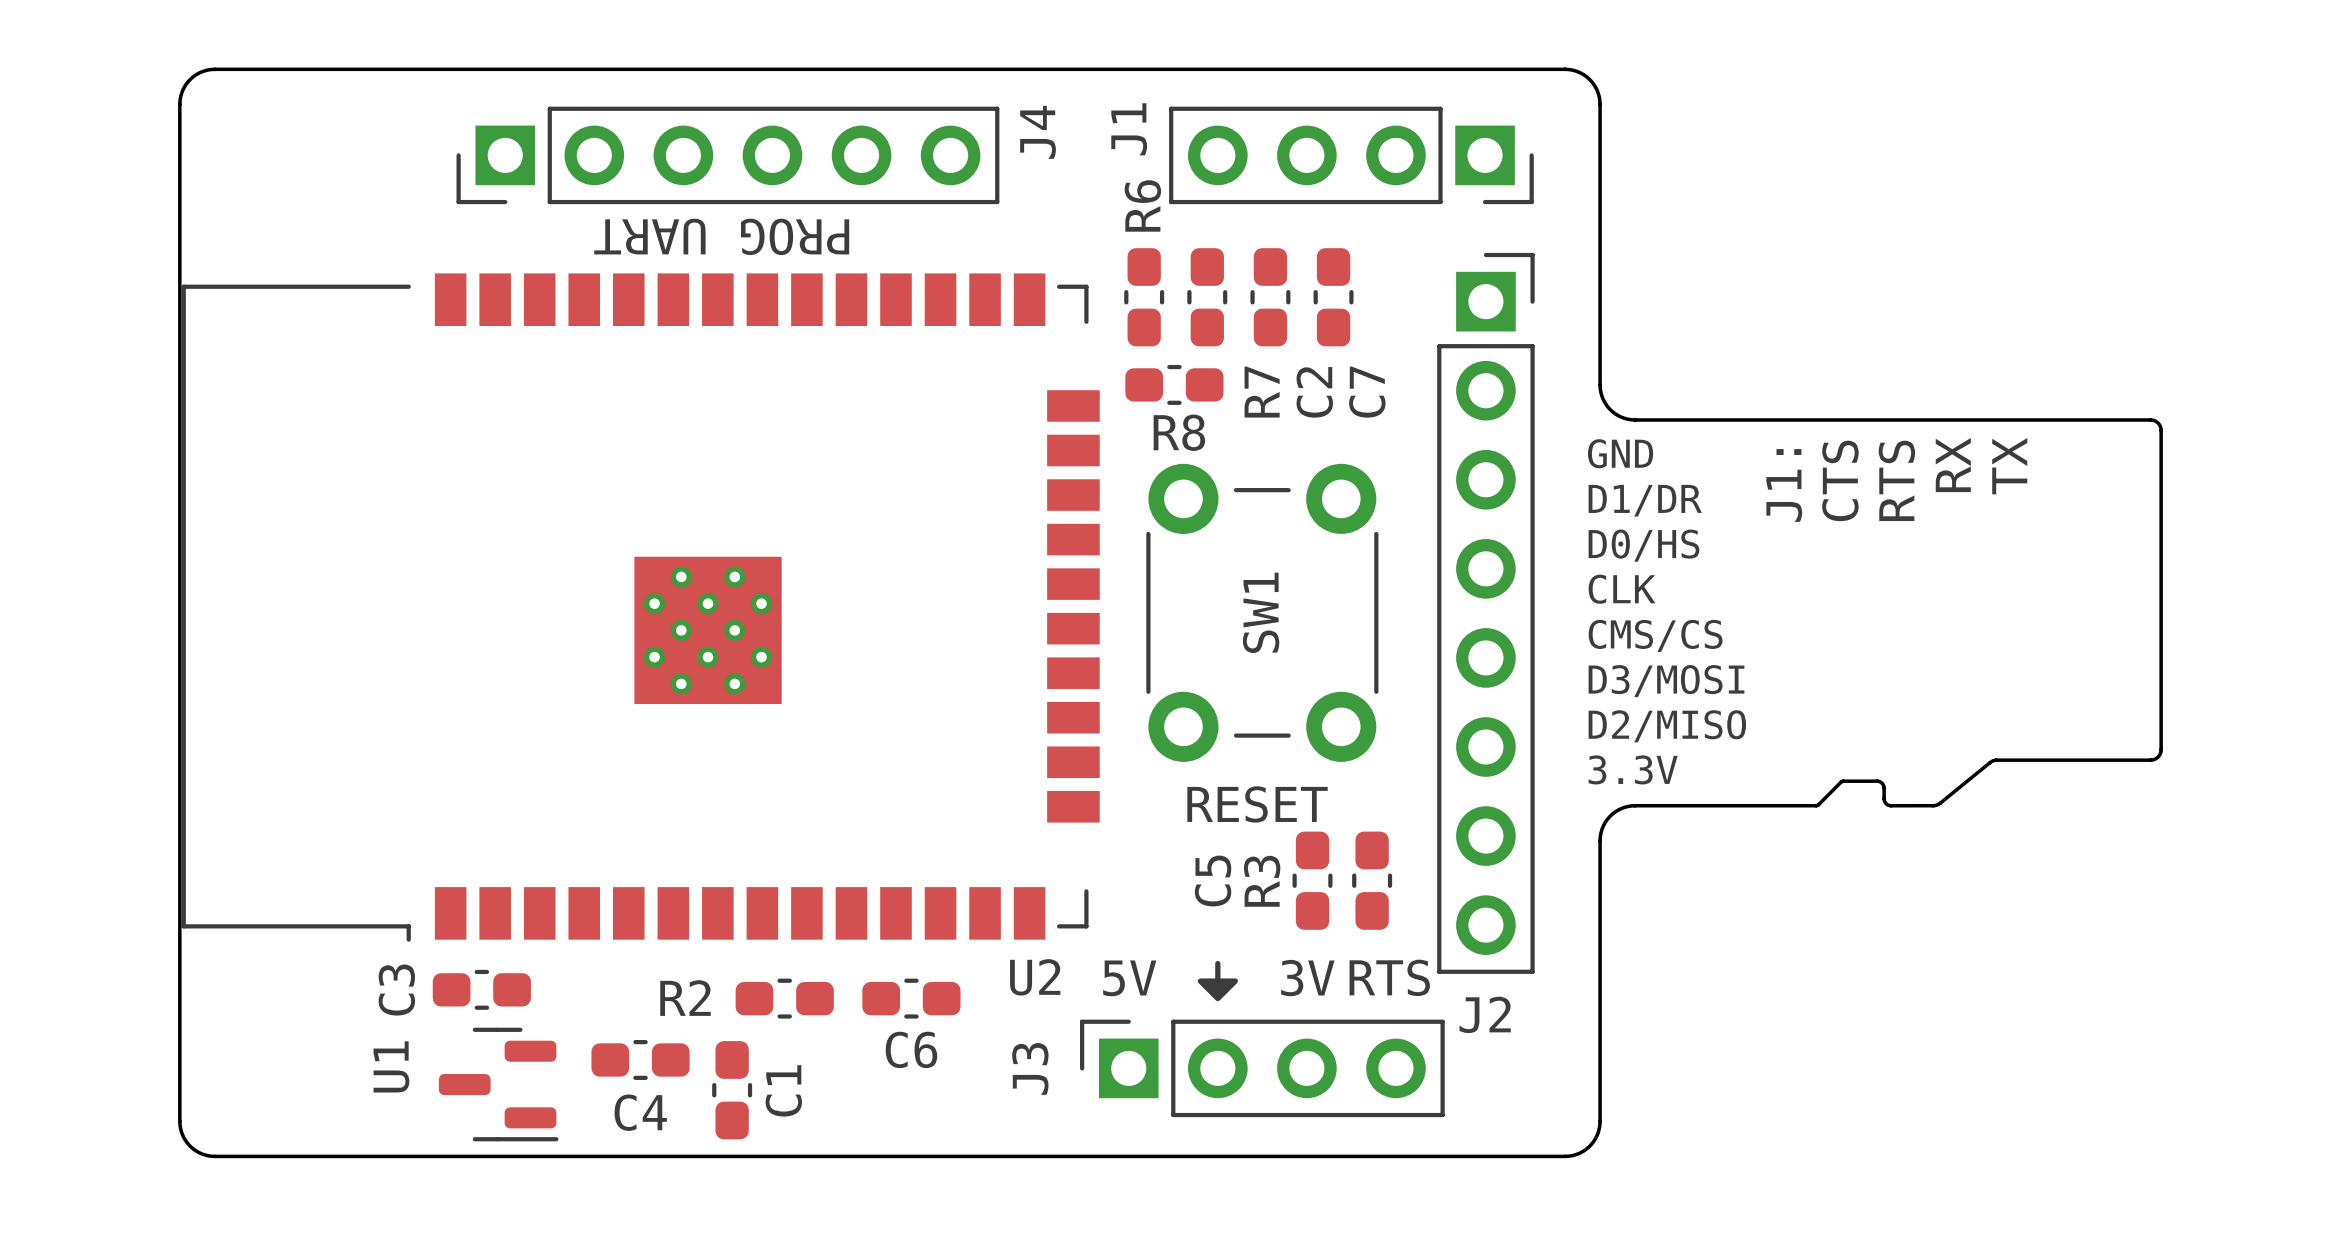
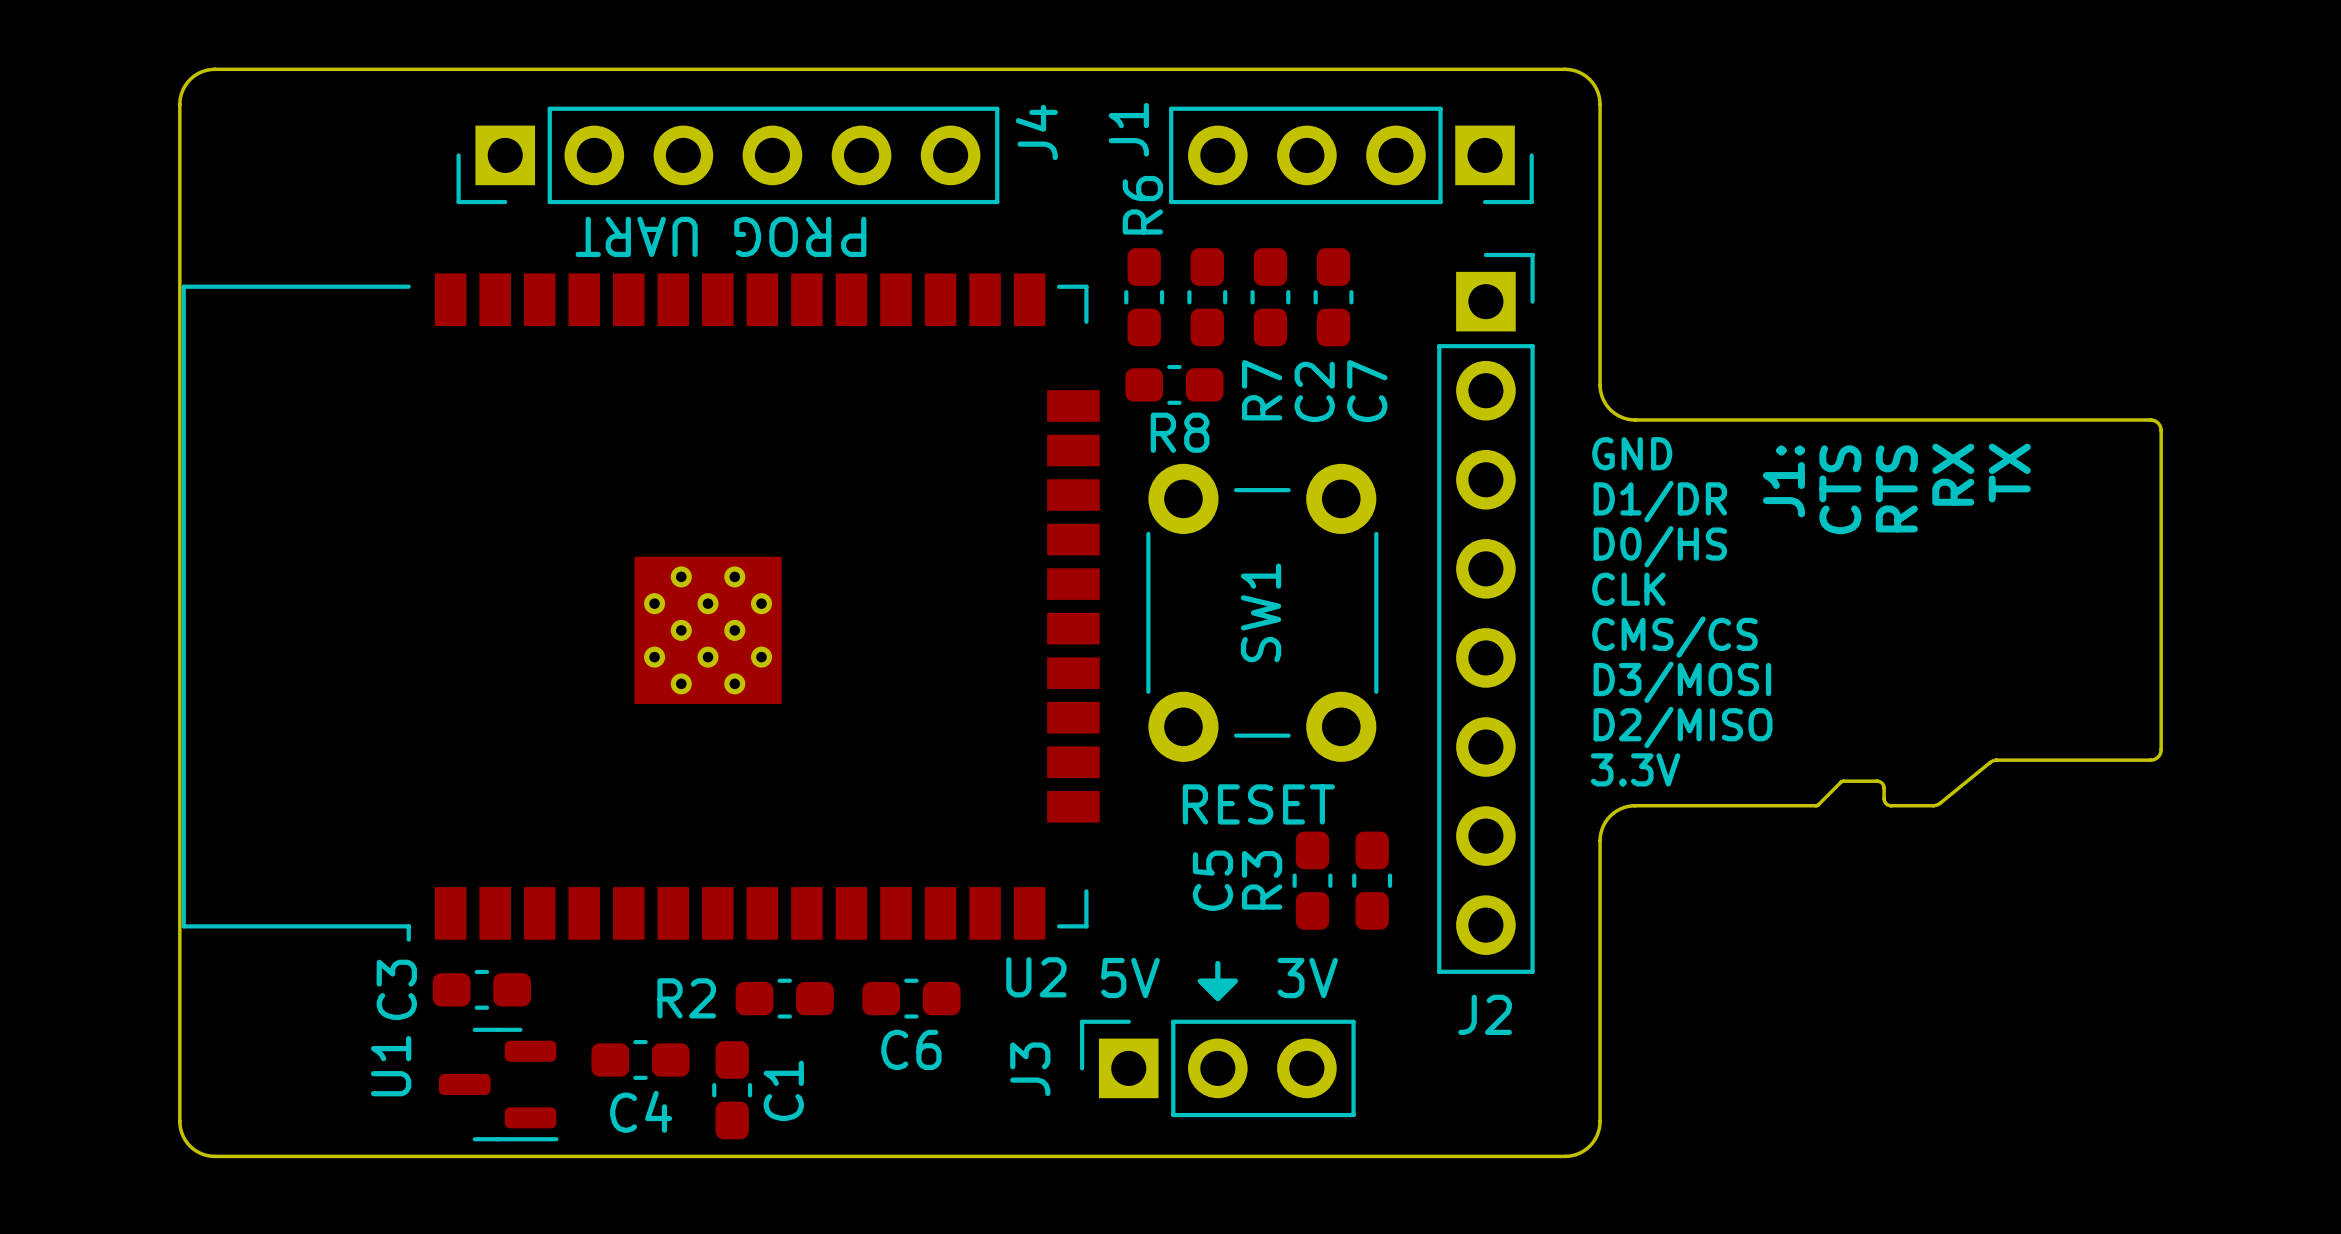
text: RTS (1389, 977) -> none
J3 footprint: [1080, 1019, 1445, 1118] -> [1080, 1019, 1356, 1118]

